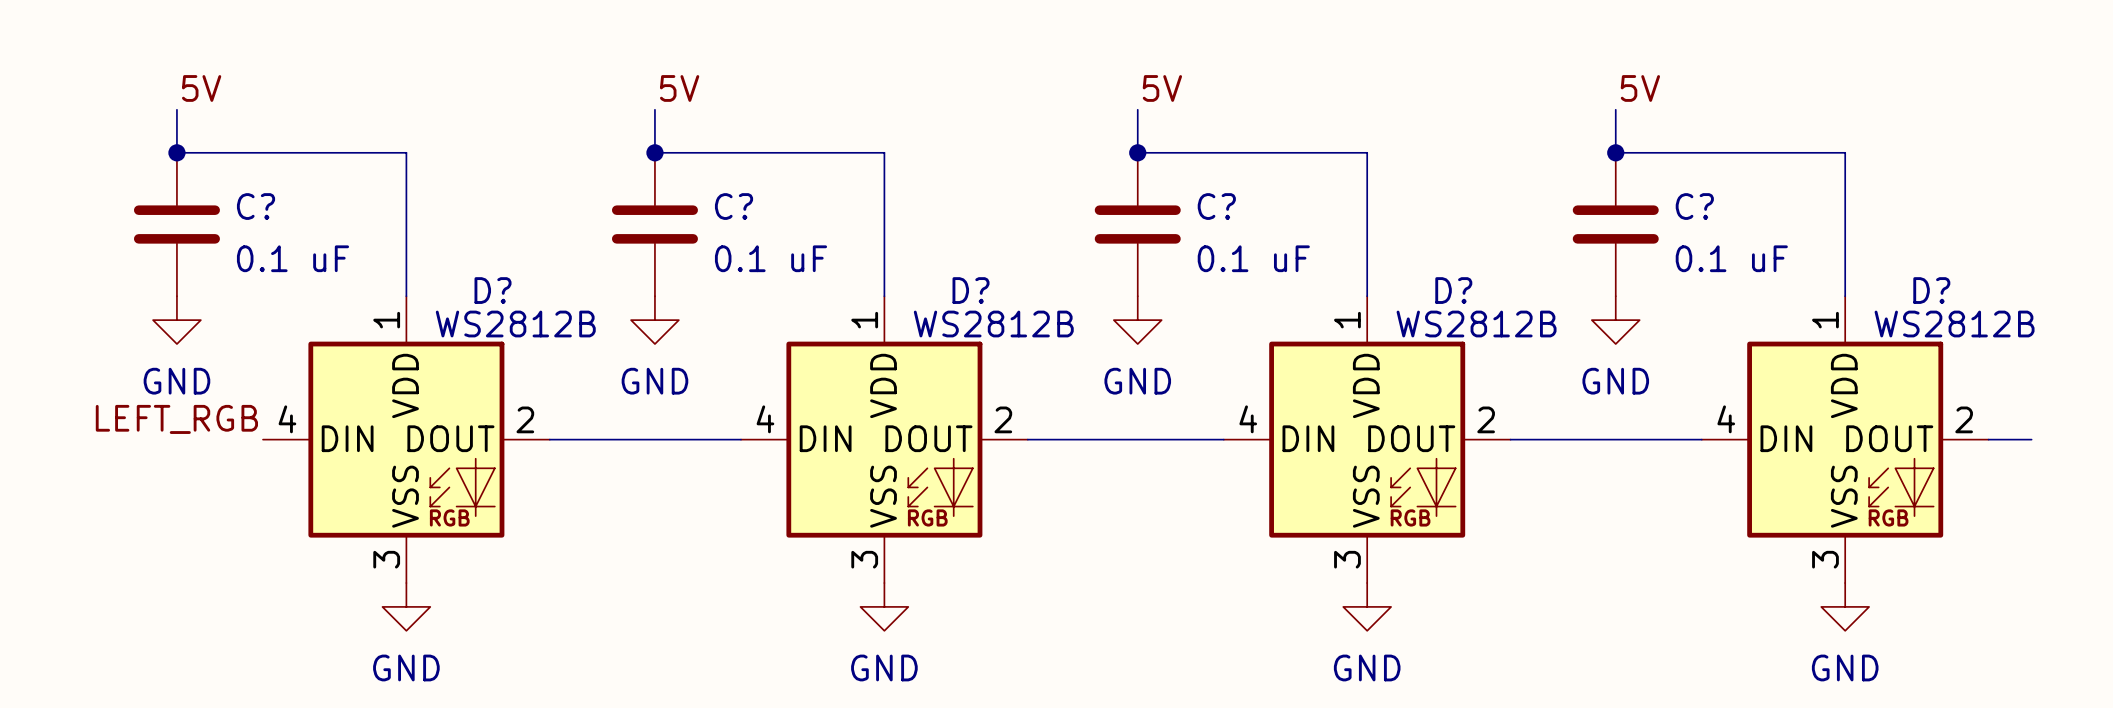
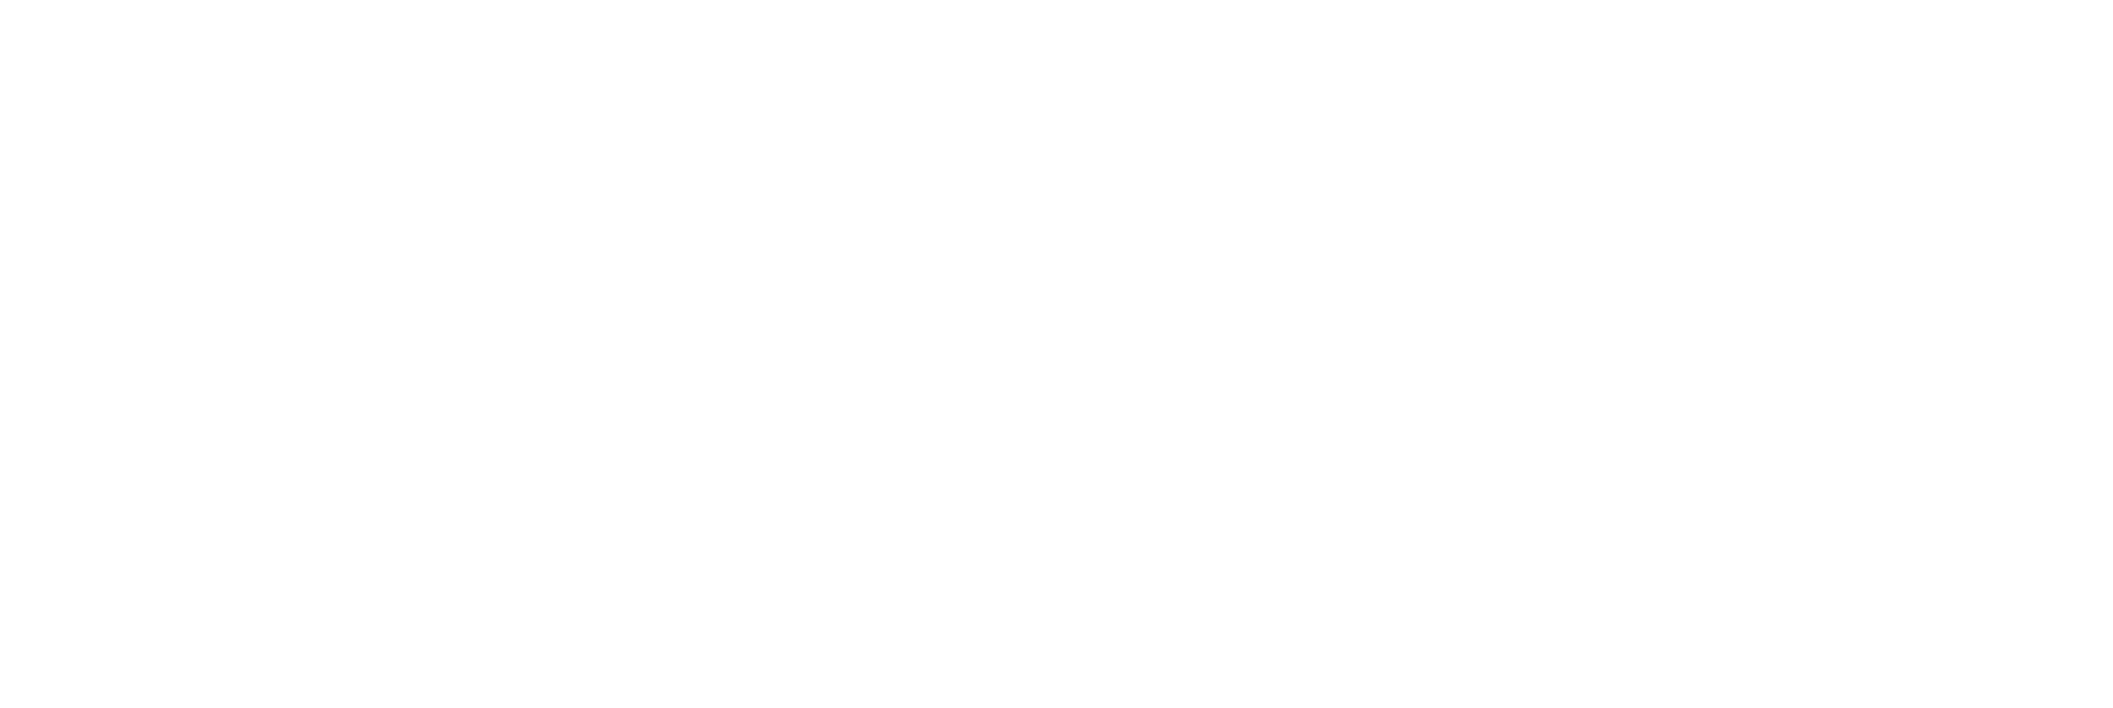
label: 5V (201, 88) -> none
label: 5V (679, 88) -> none
label: 5V (1162, 88) -> none
label: 5V (1640, 88) -> none
wire: (176, 109) (176, 152) (406, 152) (406, 296) -> none
wire: (654, 109) (654, 152) (884, 152) (884, 296) -> none
wire: (1137, 109) (1137, 152) (1367, 152) (1367, 296) -> none
wire: (1615, 109) (1615, 152) (1845, 152) (1845, 296) -> none
junction: (176, 152) -> none
junction: (654, 152) -> none
junction: (1137, 152) -> none
junction: (1615, 152) -> none
C?: 0.1 uF (176, 224) -> none
C?: 0.1 uF (654, 224) -> none
C?: 0.1 uF (1137, 224) -> none
C?: 0.1 uF (1615, 224) -> none
power symbol: GND (176, 320) -> none
power symbol: GND (654, 320) -> none
power symbol: GND (1137, 320) -> none
power symbol: GND (1615, 320) -> none
label: LEFT_RGB (176, 419) -> none
D?: WS2812B (406, 439) -> none
wire: (549, 439) (741, 439) -> none
D?: WS2812B (884, 439) -> none
wire: (1027, 439) (1223, 439) -> none
D?: WS2812B (1367, 439) -> none
wire: (1510, 439) (1701, 439) -> none
D?: WS2812B (1845, 439) -> none
wire: (1988, 439) (2031, 439) -> none
power symbol: GND (406, 606) -> none
power symbol: GND (884, 606) -> none
power symbol: GND (1367, 606) -> none
power symbol: GND (1845, 606) -> none

